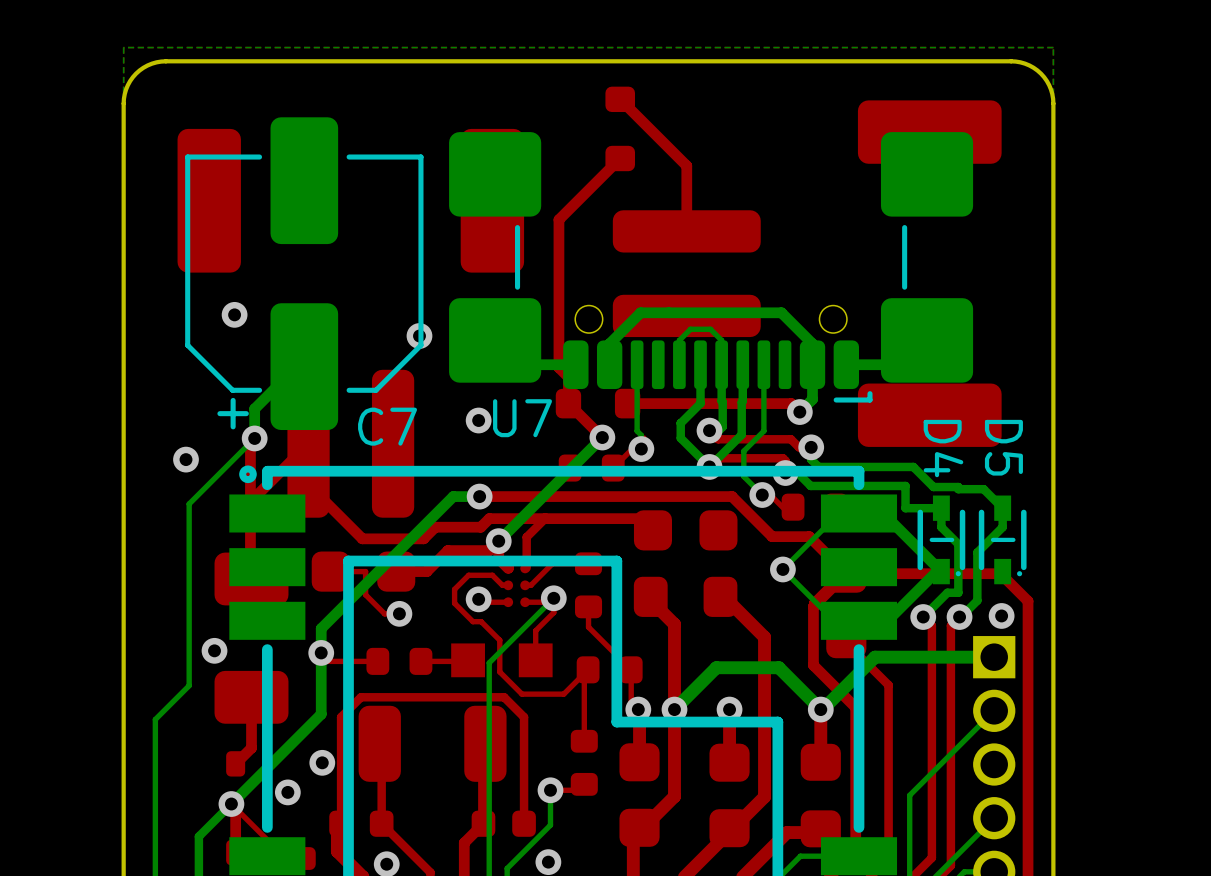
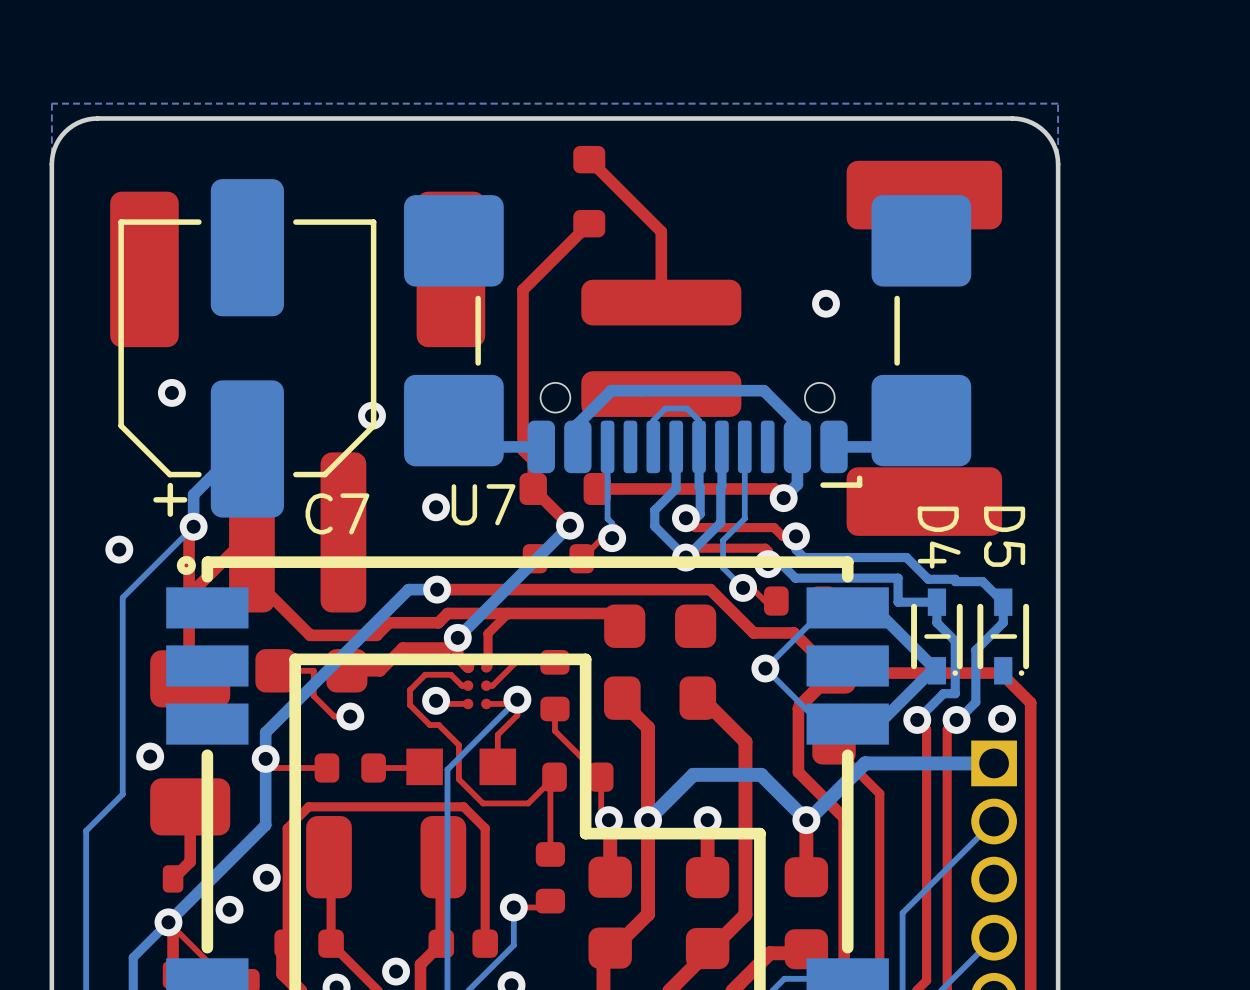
via: none -> (825, 303)
via: none -> (396, 971)

